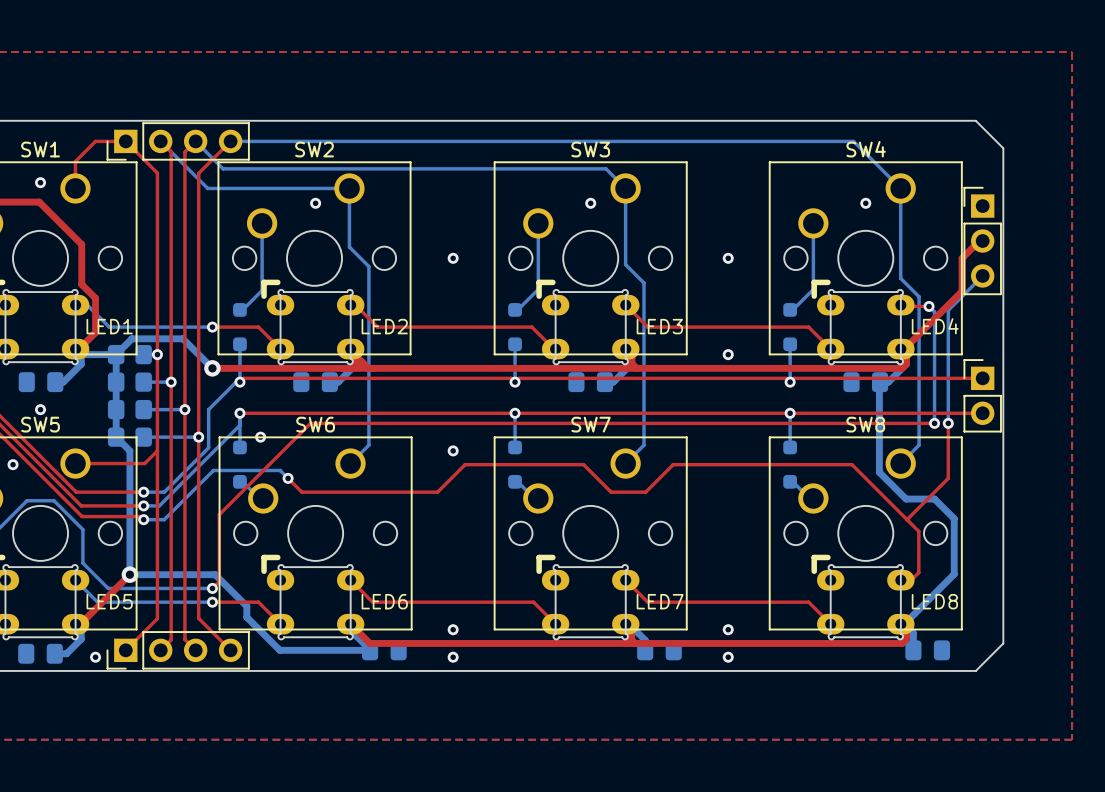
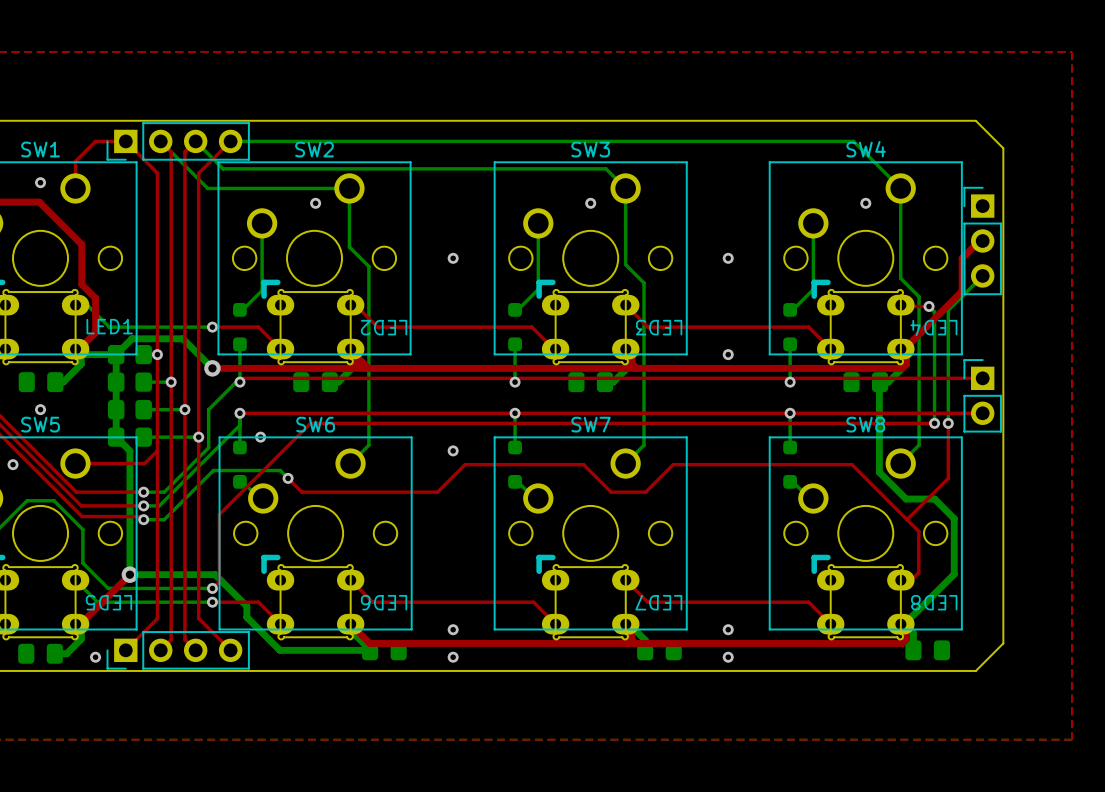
LED2 name rotation: 0° (384, 326) -> 180° (384, 327)
LED3 name rotation: 0° (659, 326) -> 180° (659, 327)
LED4 name rotation: 0° (935, 326) -> 180° (933, 327)
LED5 name rotation: 0° (109, 601) -> 180° (108, 602)
LED6 name rotation: 0° (384, 601) -> 180° (384, 602)
LED7 name rotation: 0° (660, 601) -> 180° (658, 602)
LED8 name rotation: 0° (934, 601) -> 180° (934, 602)

